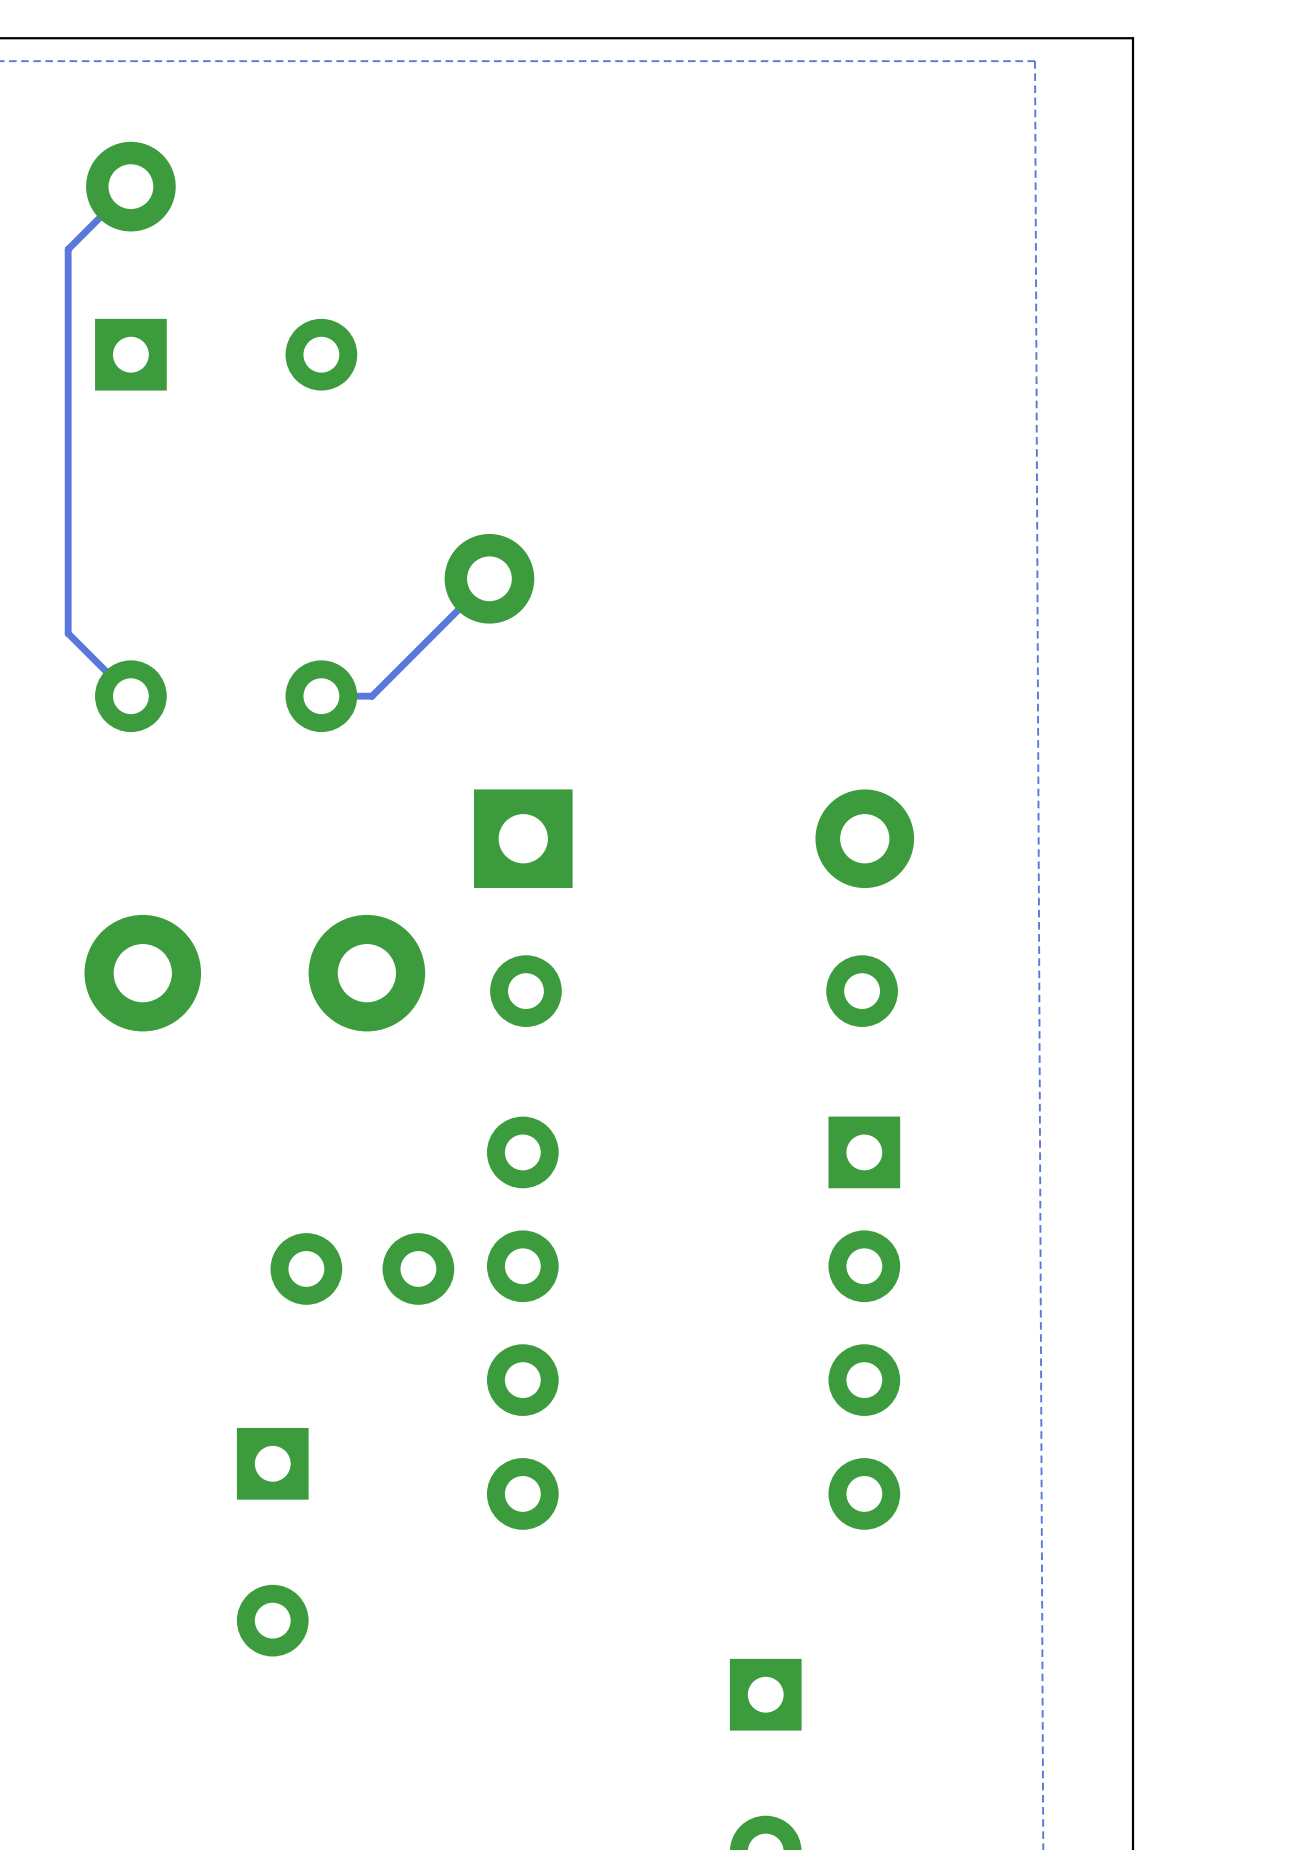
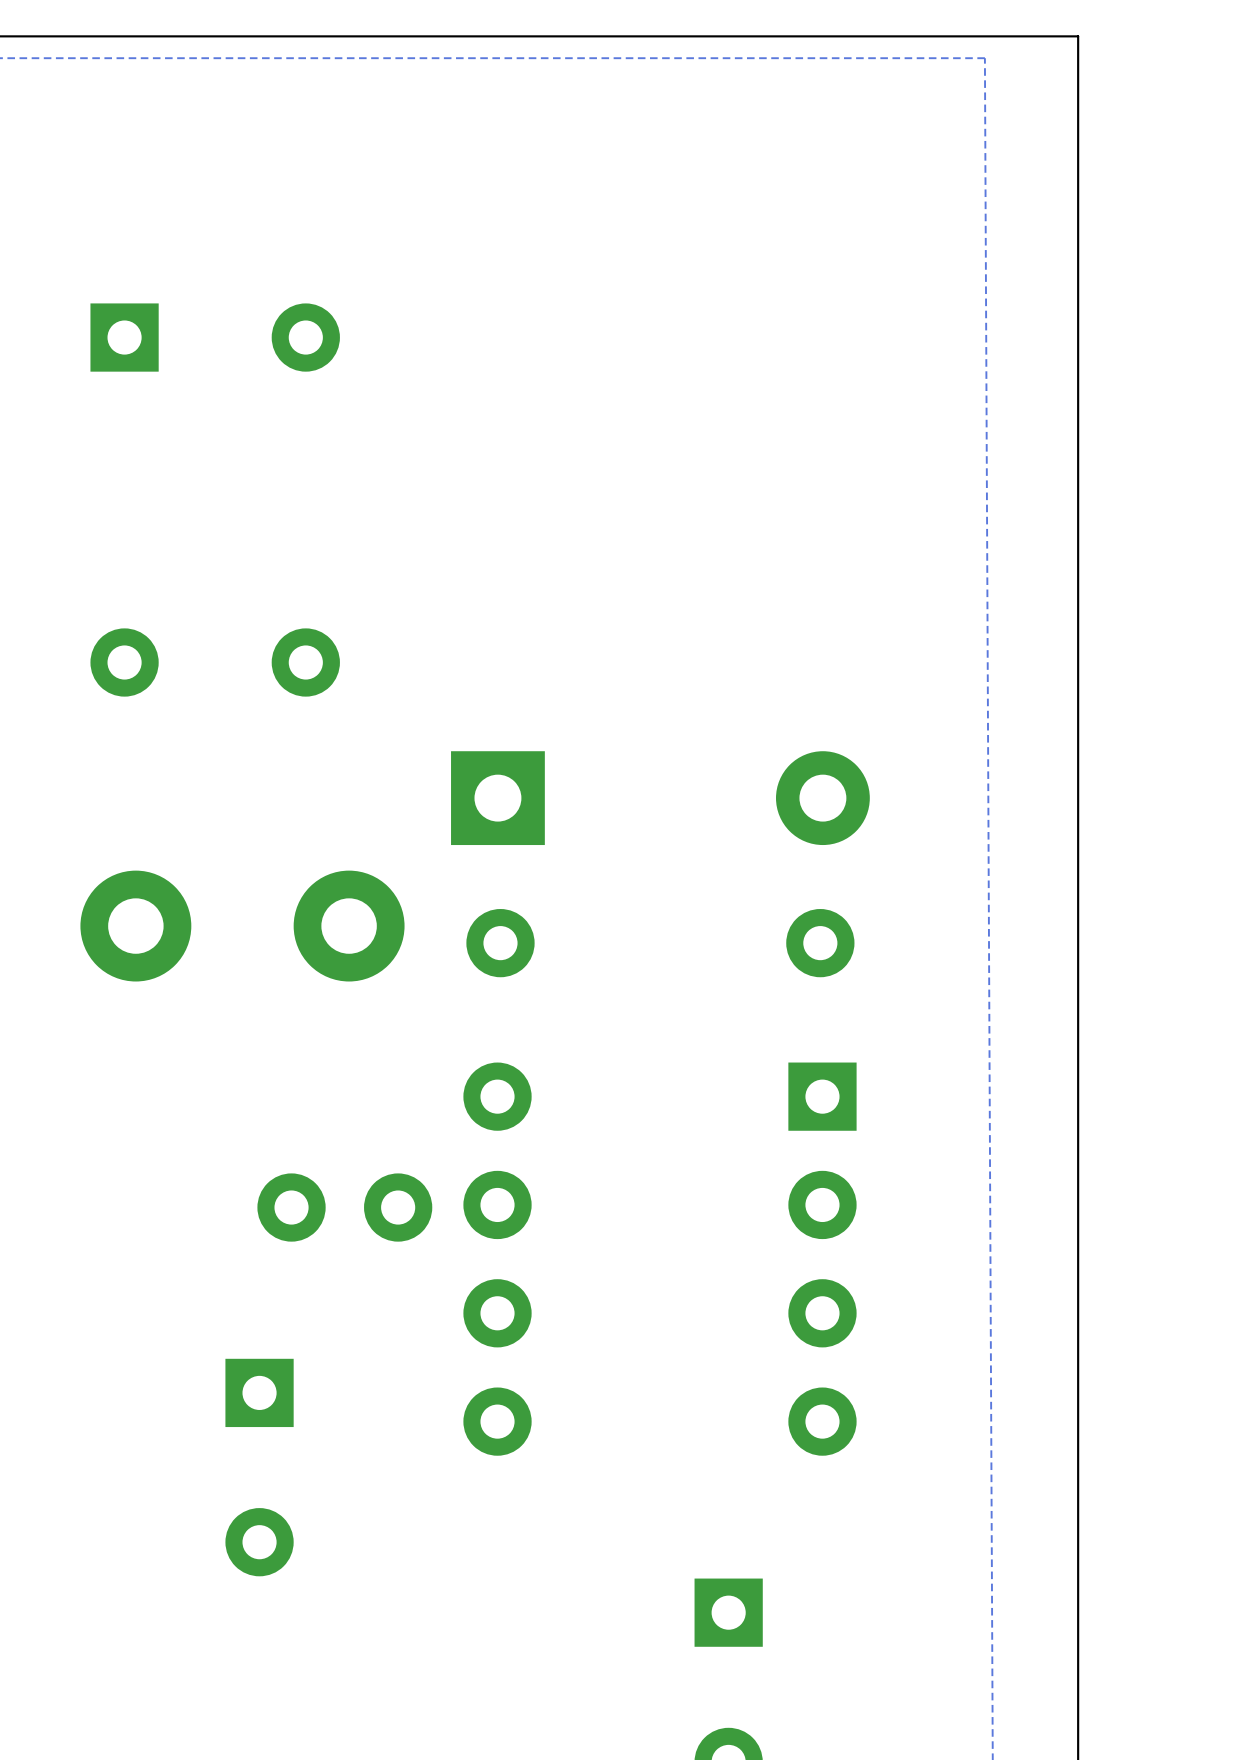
track: (130, 186) (68, 249) (68, 633) (130, 696) -> none
part: (130, 186) -> none
track: (489, 578) (372, 696) (321, 696) -> none
part: (489, 578) -> none

